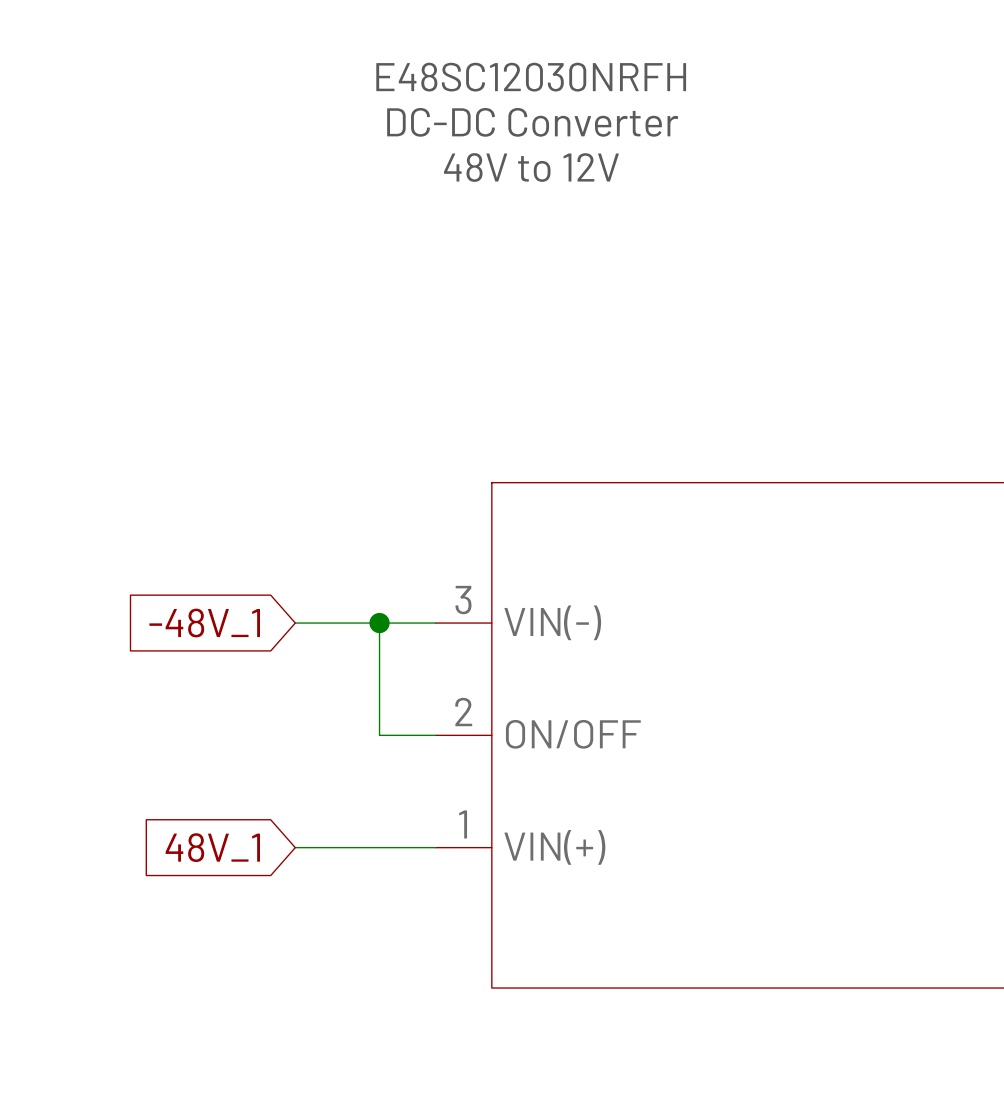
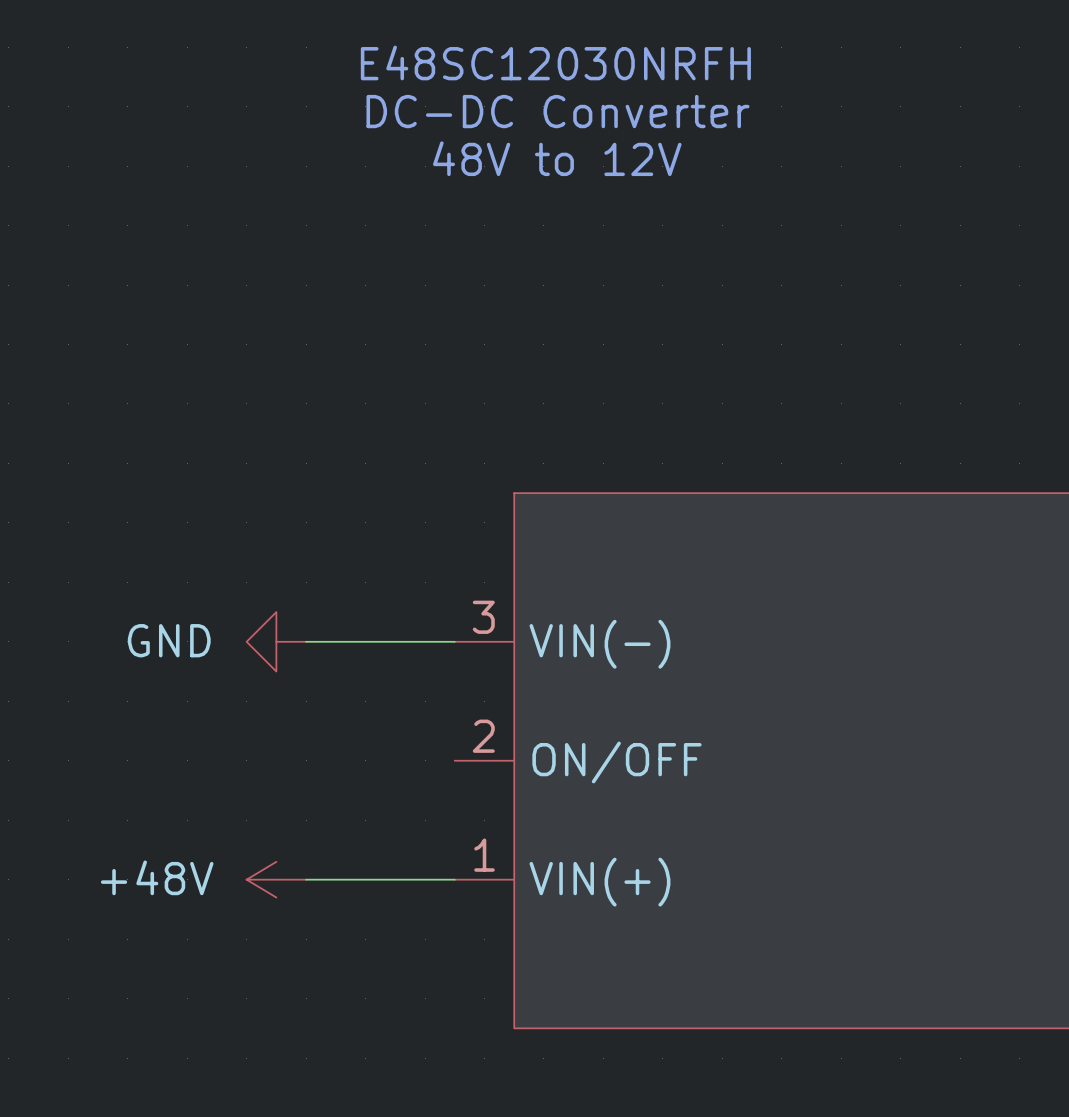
global label: -48V_1 (204, 623) -> none
power symbol: none -> GND (276, 641)
wire: (379, 623) (379, 735) (435, 735) -> none
junction: (379, 623) -> none
global label: 48V_1 (212, 847) -> none
power symbol: none -> +48V (276, 879)

